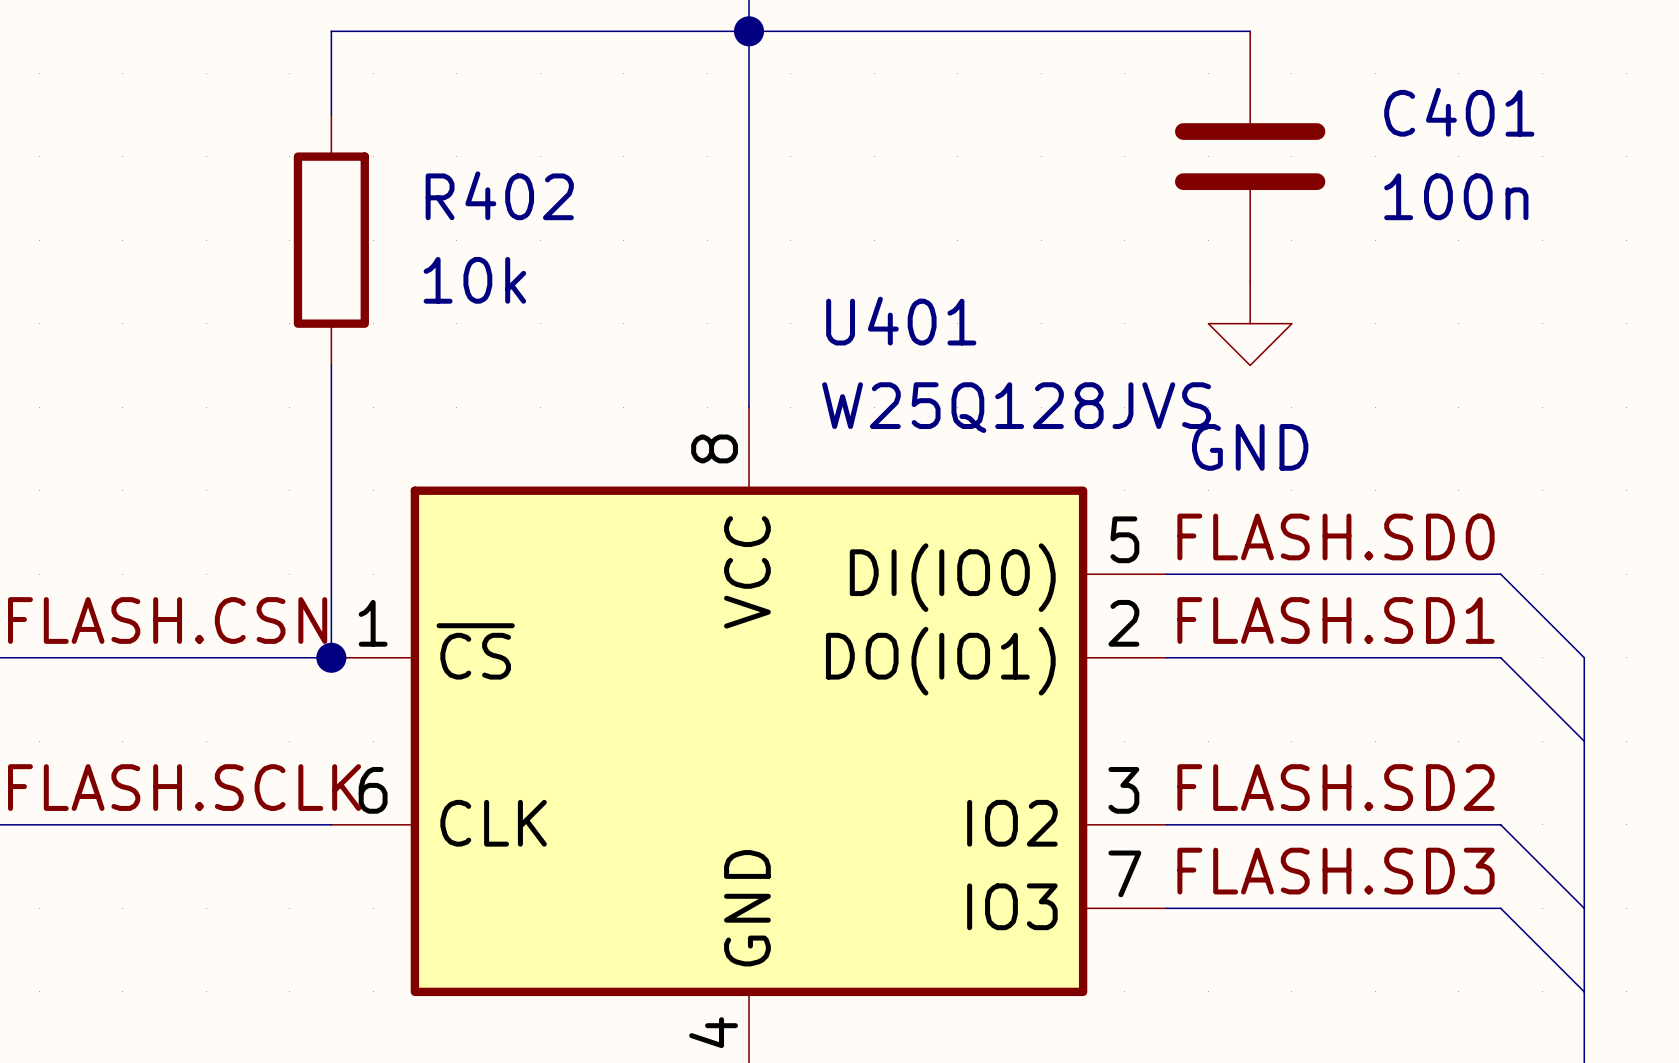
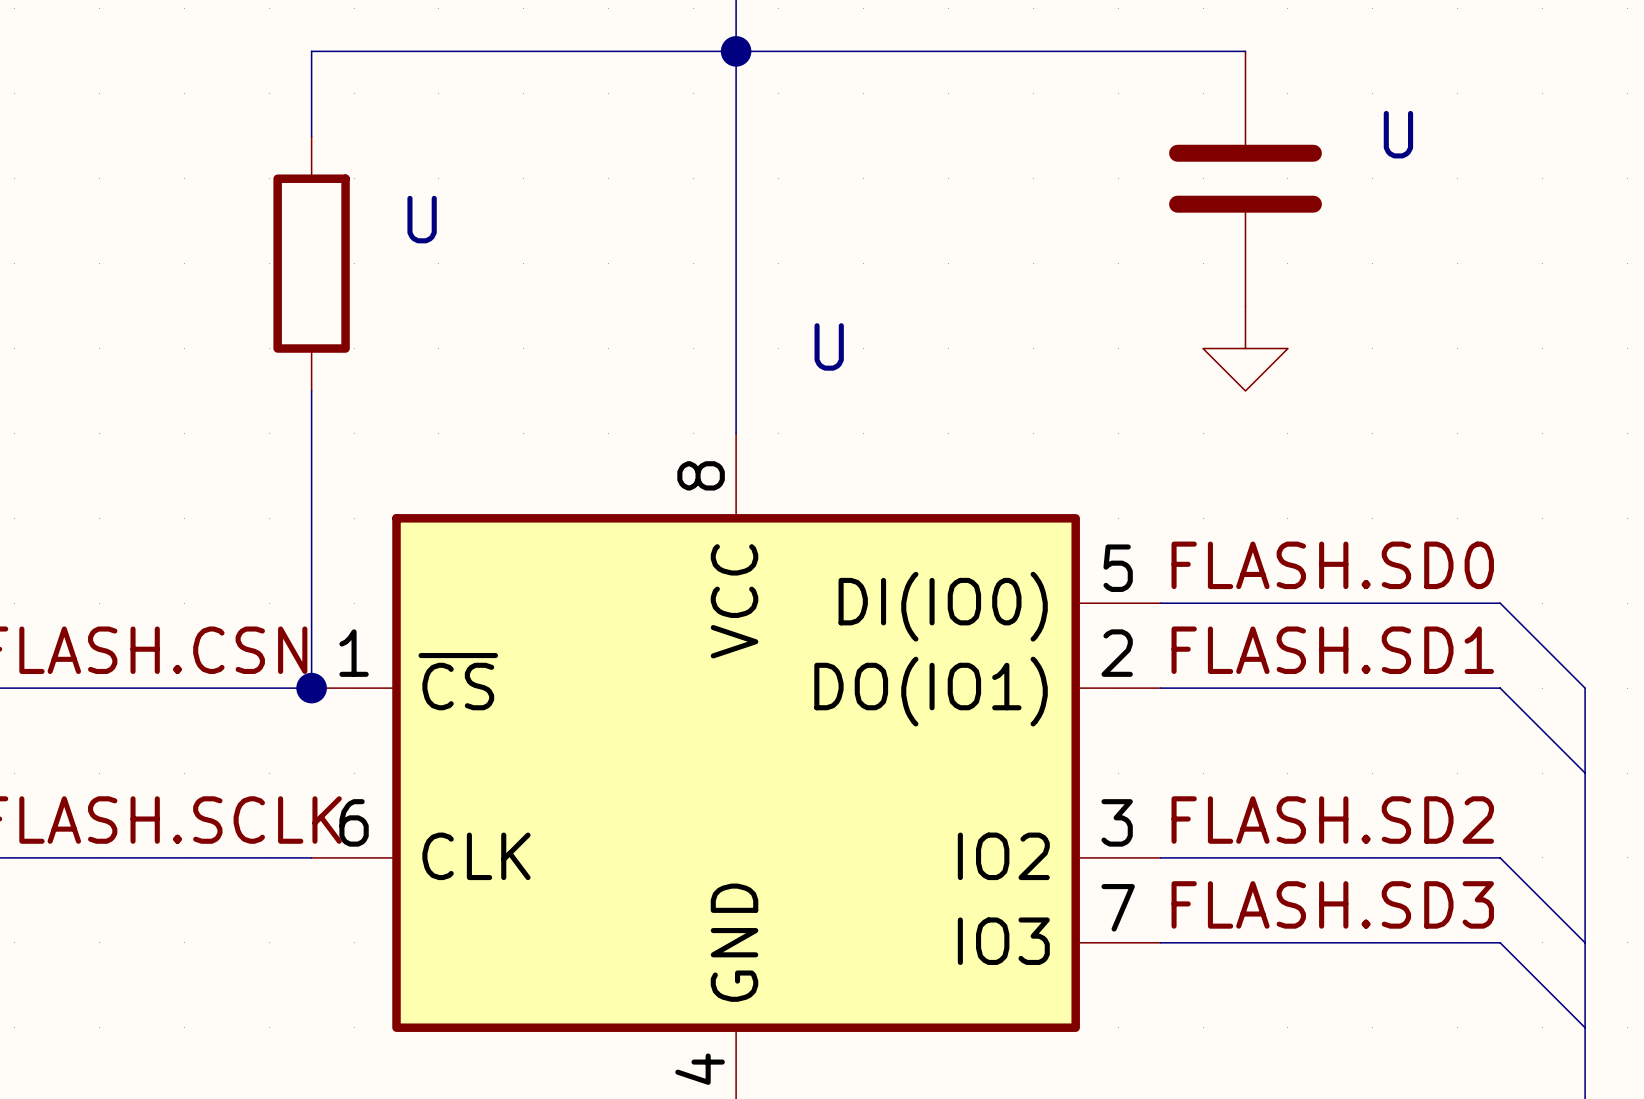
C401 name: C401 (1459, 112) -> U (1398, 134)
R402 name: R402 (499, 195) -> U (422, 219)
C401 value: 100n (1456, 196) -> none
R402 value: 10k (474, 280) -> none
U401 name: U401 (901, 321) -> U (829, 346)
U401 value: W25Q128JVS (1016, 407) -> none
power symbol text: GND (1250, 447) -> none

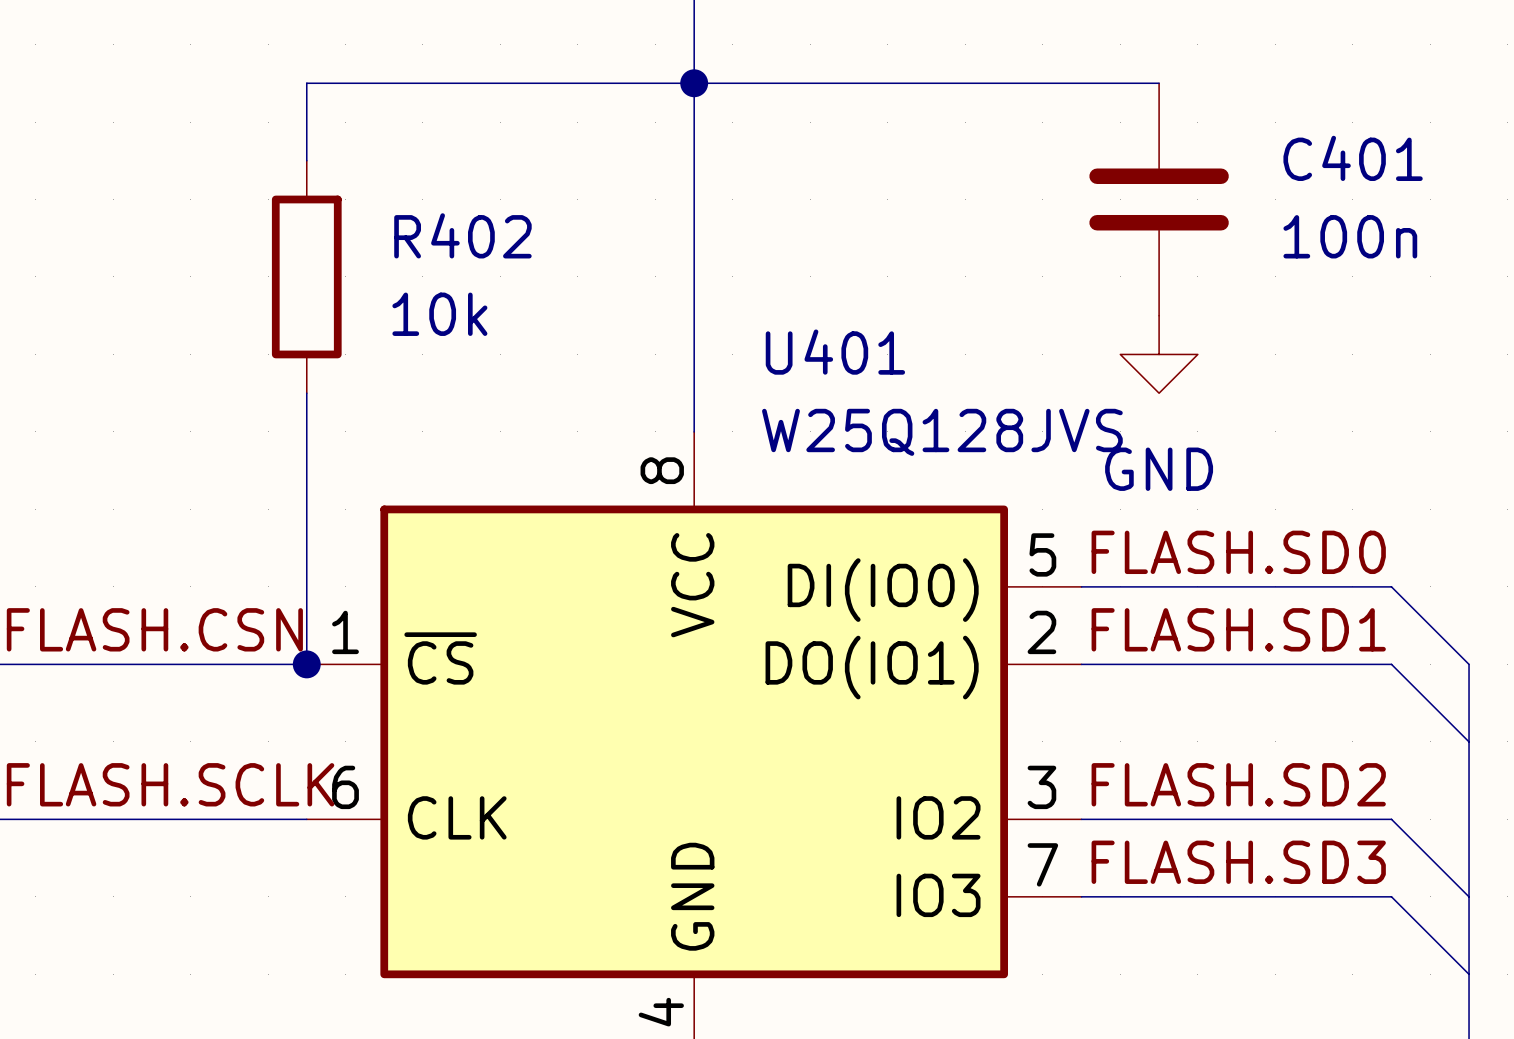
U name: U (1398, 134) -> C401 (1353, 158)
U name: U (422, 219) -> R402 (462, 235)
U value: none -> 100n (1350, 236)
U value: none -> 10k (439, 314)
U name: U (829, 346) -> U401 (835, 352)
U value: none -> W25Q128JVS (942, 432)
power symbol text: none -> GND (1159, 469)

